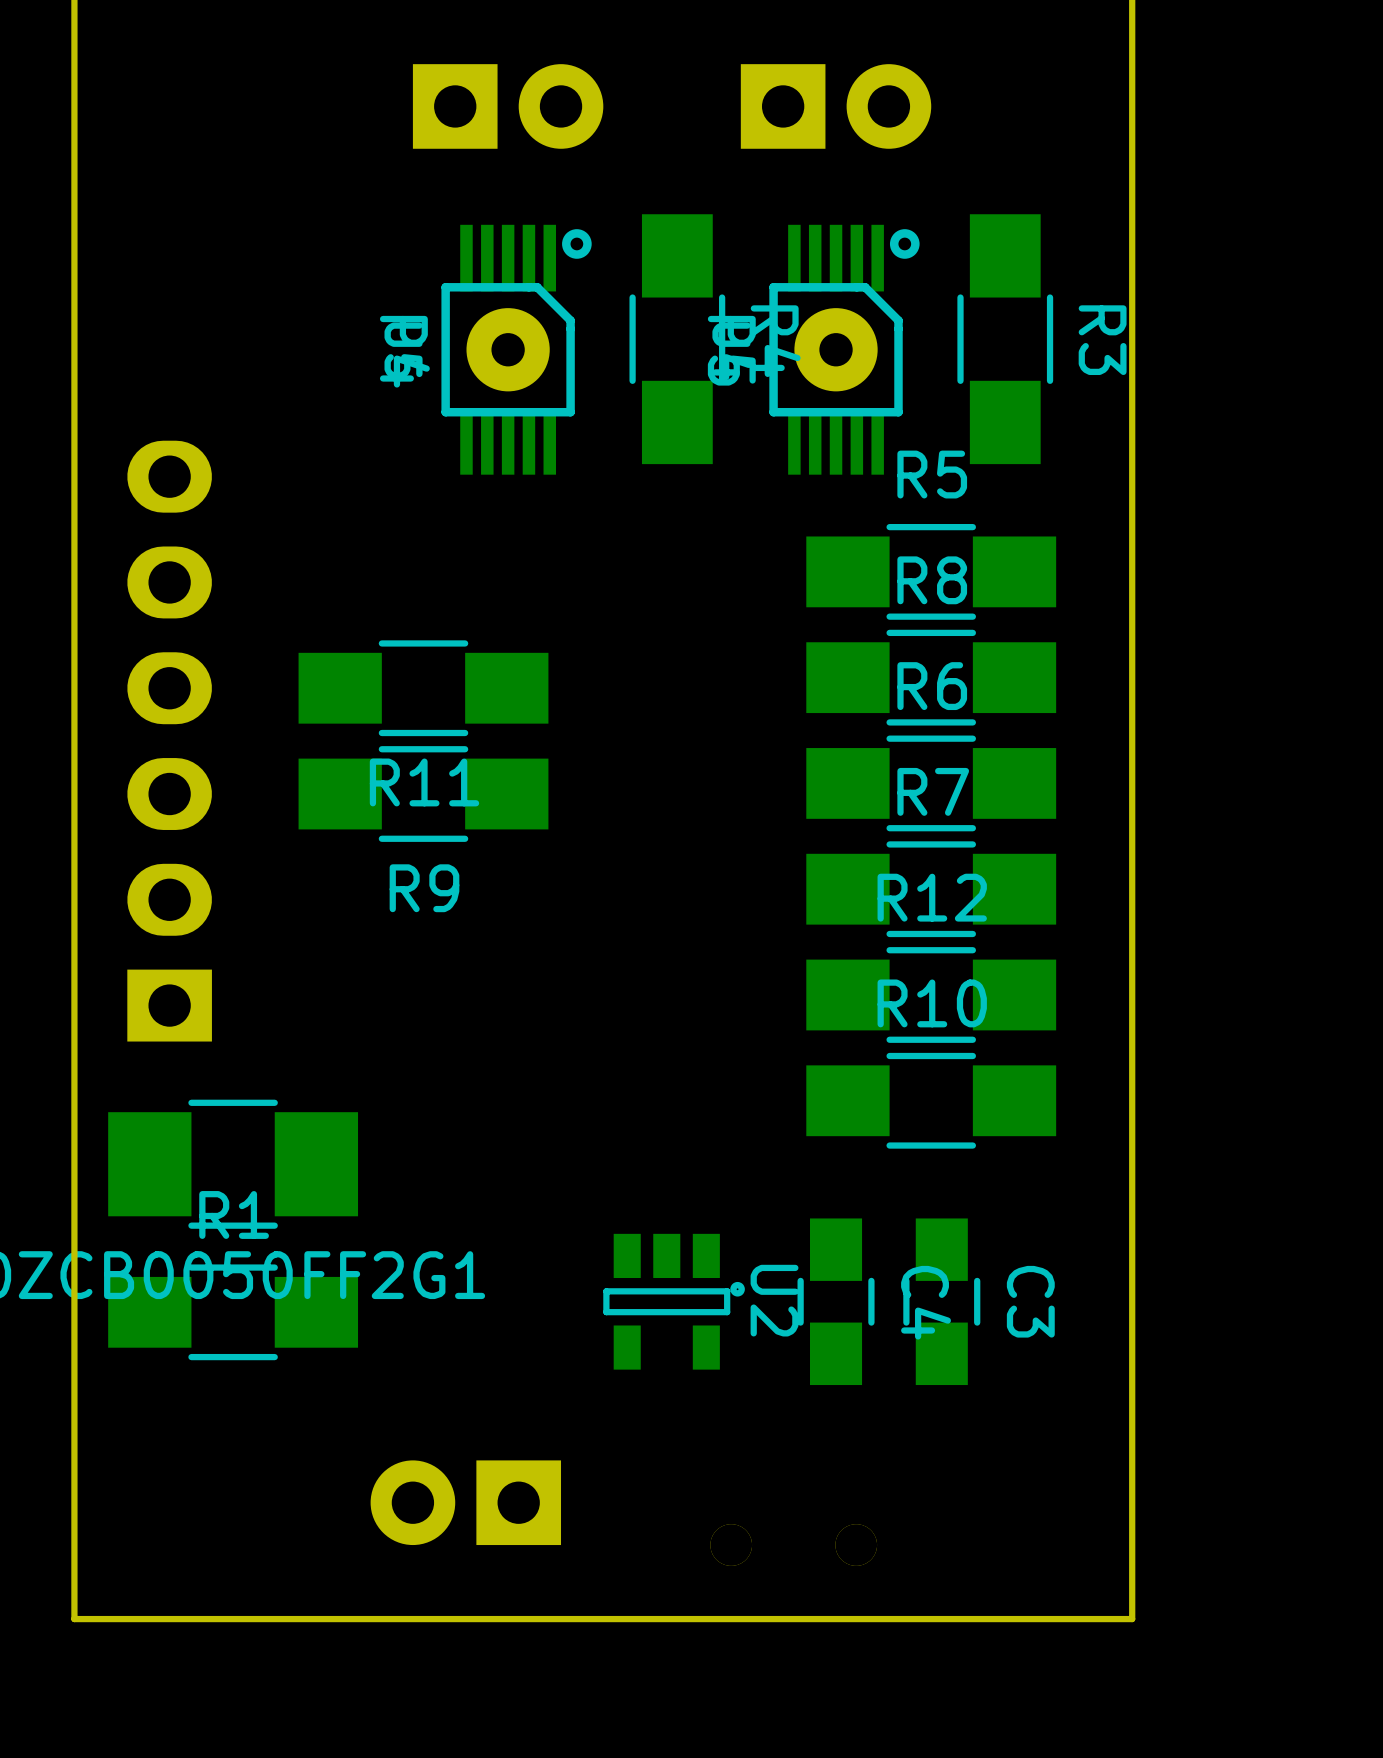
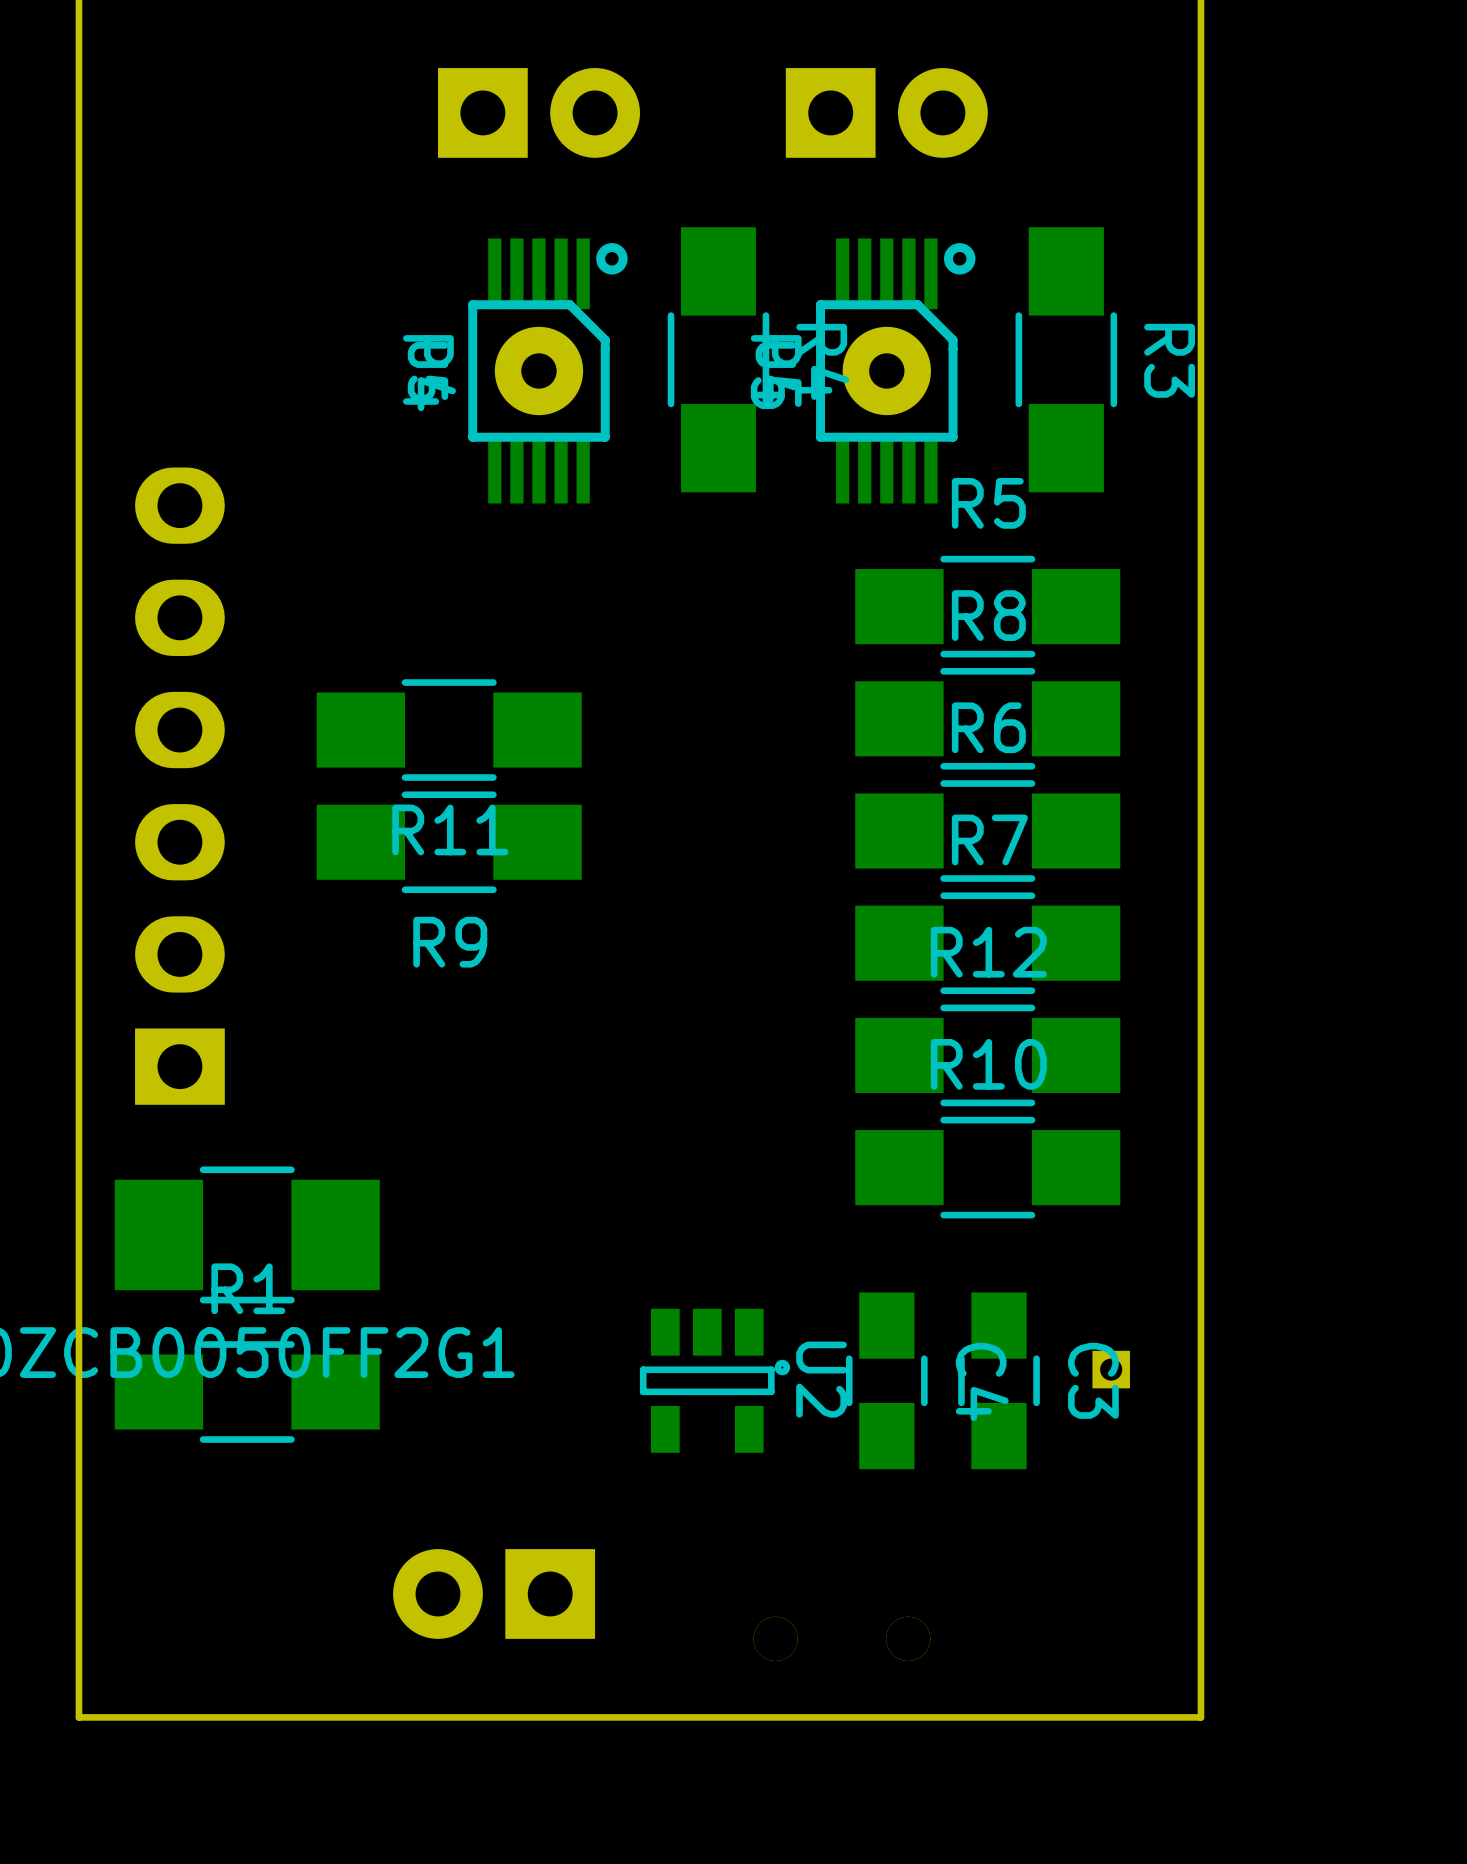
part: none -> (1111, 1369)

